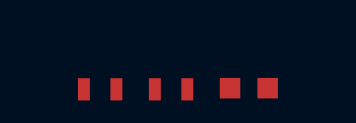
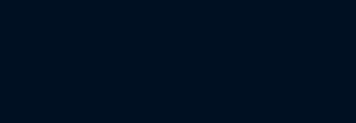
part: (248, 88) -> none
part: (100, 89) -> none
part: (171, 89) -> none

